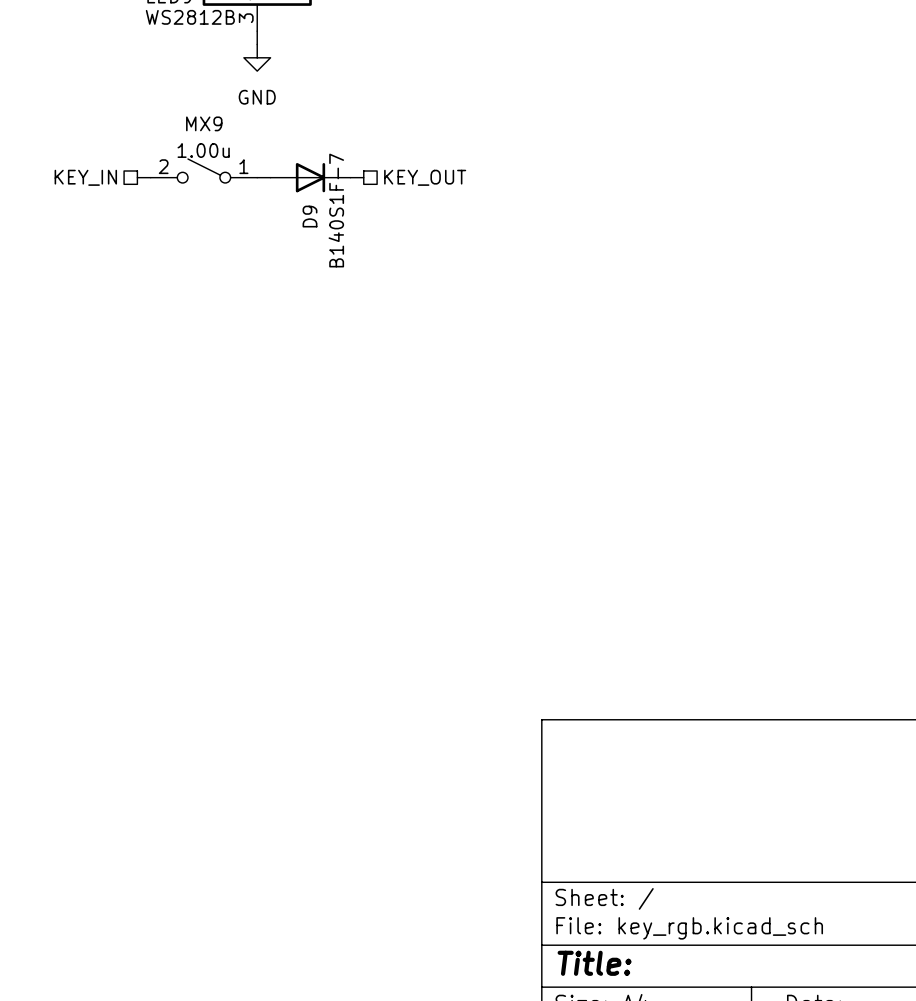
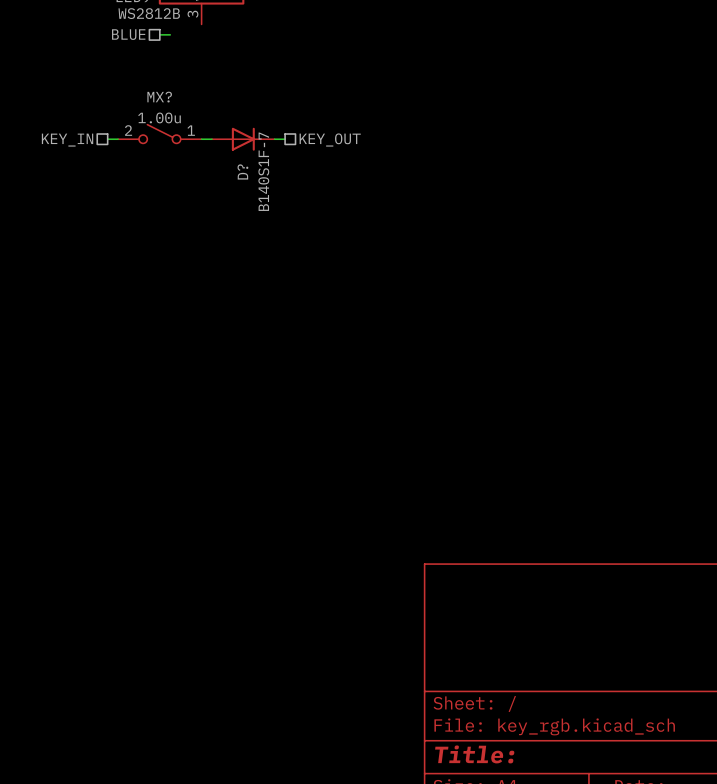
wire: (257, 31) (257, 44) -> none
hierarchical label: none -> BLUE (128, 34)
wire: none -> (159, 34) (170, 34)
power symbol: GND (257, 57) -> none
MX9 name: MX9 (204, 123) -> MX? (159, 97)
D9 name: D9 (310, 216) -> D? (242, 171)

